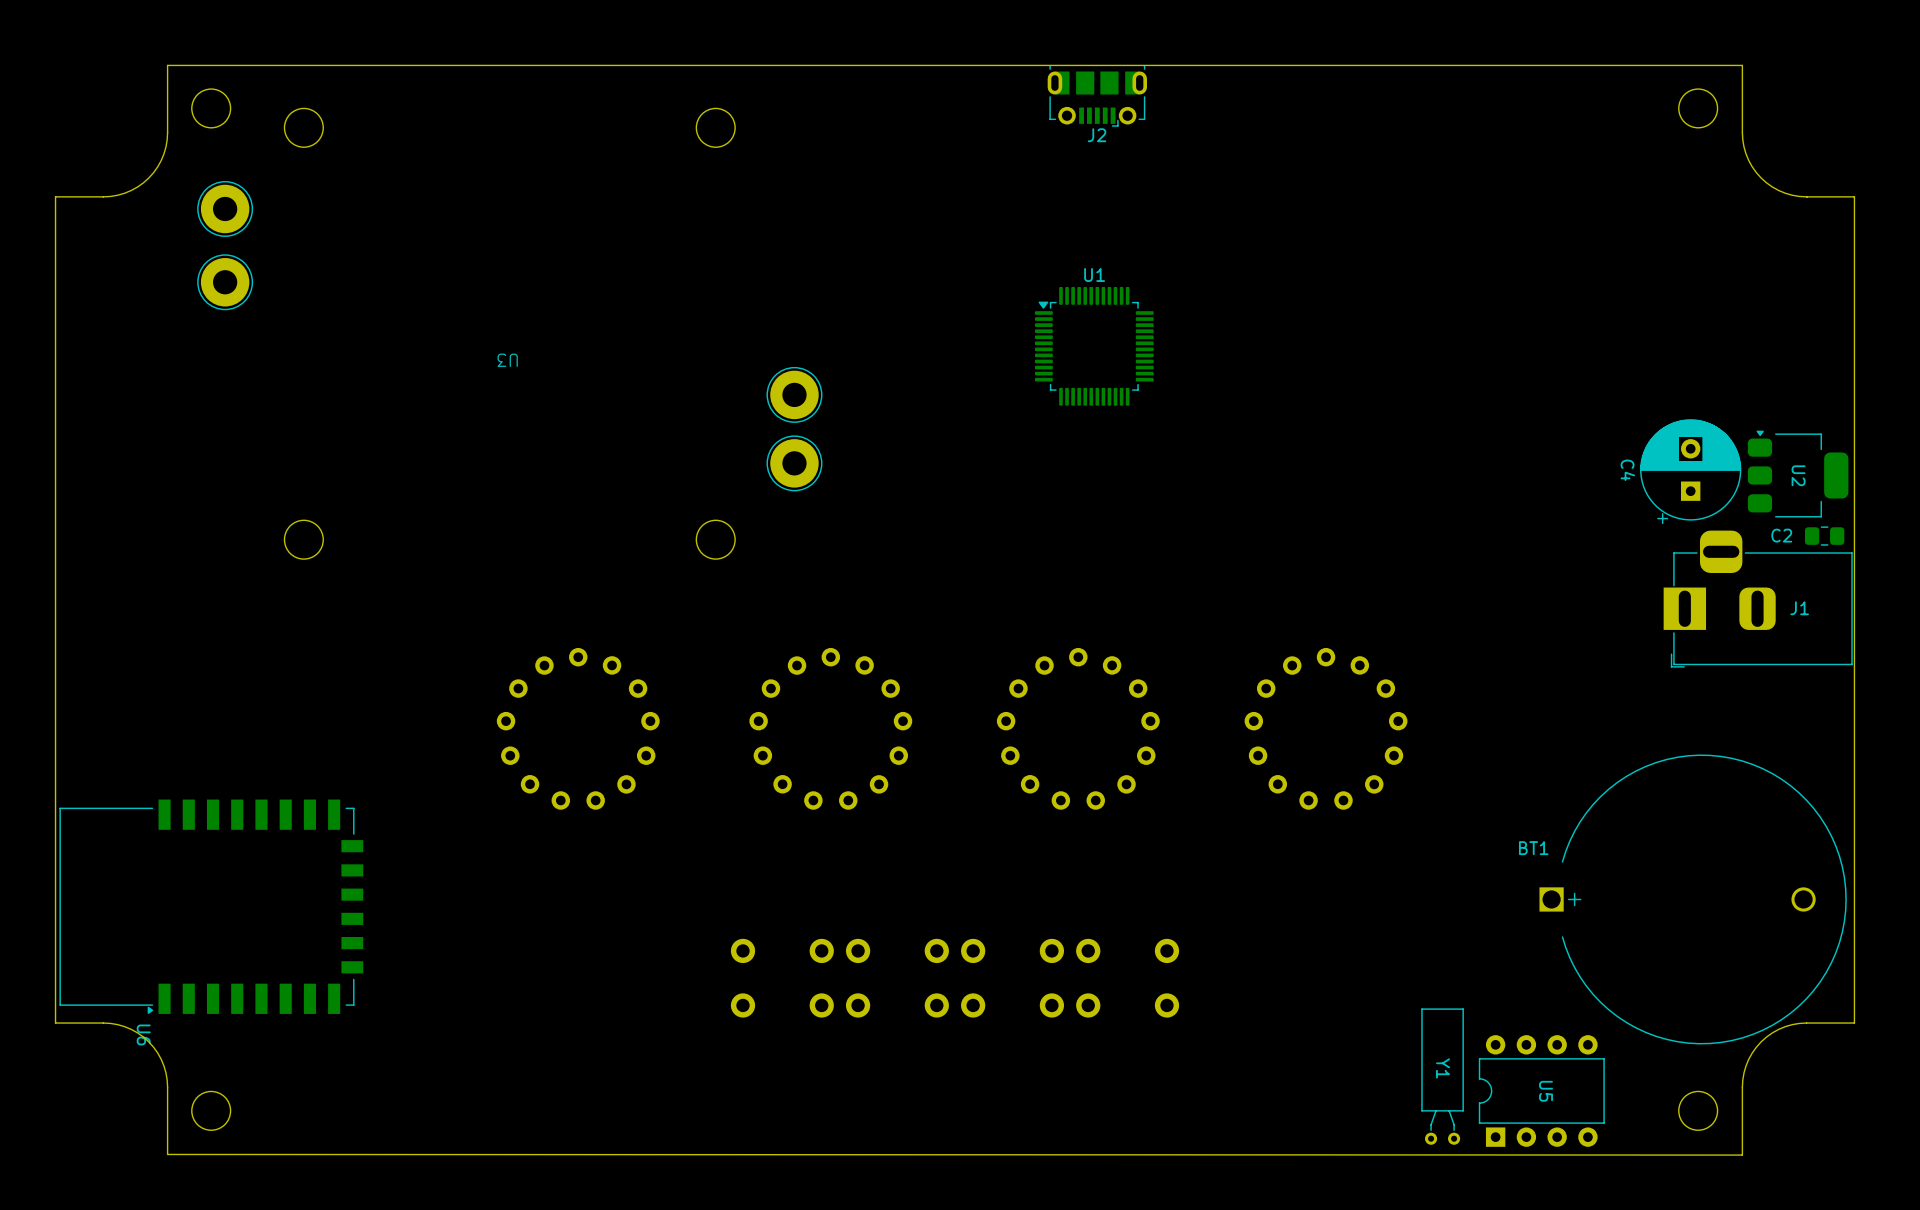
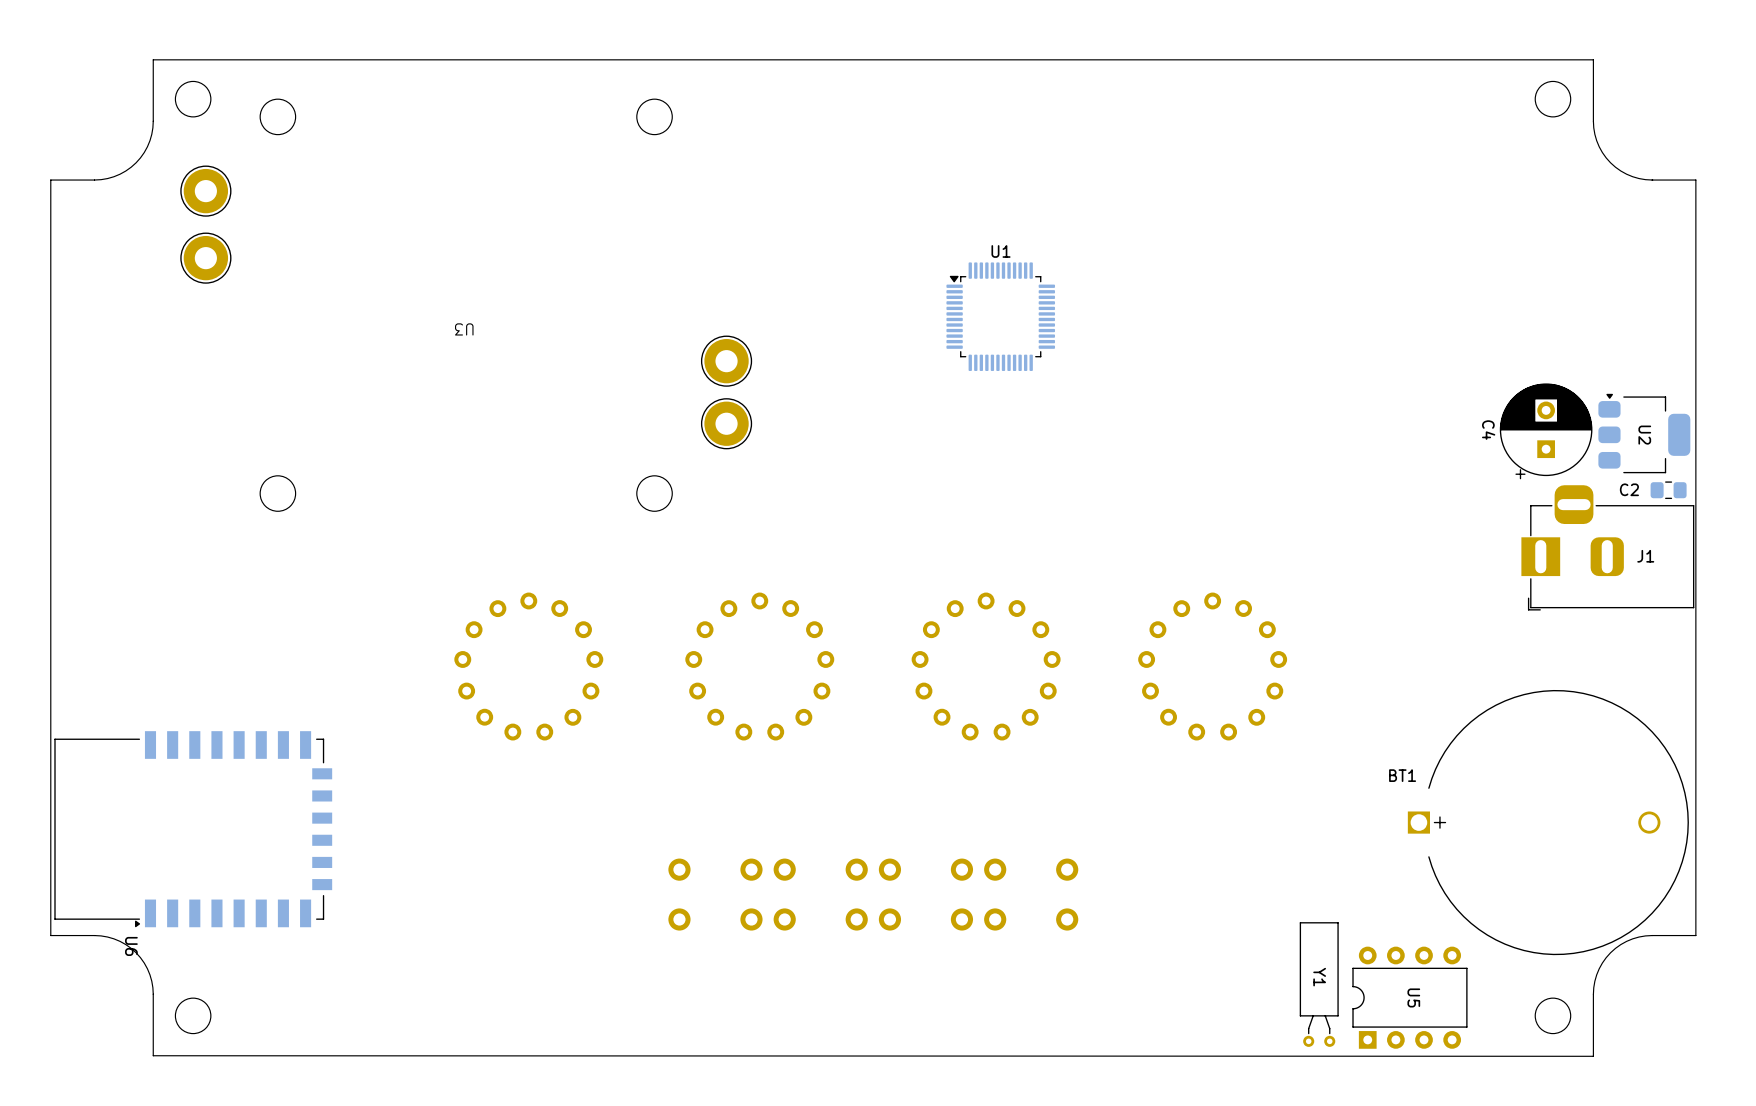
J2: (1097, 96) -> none

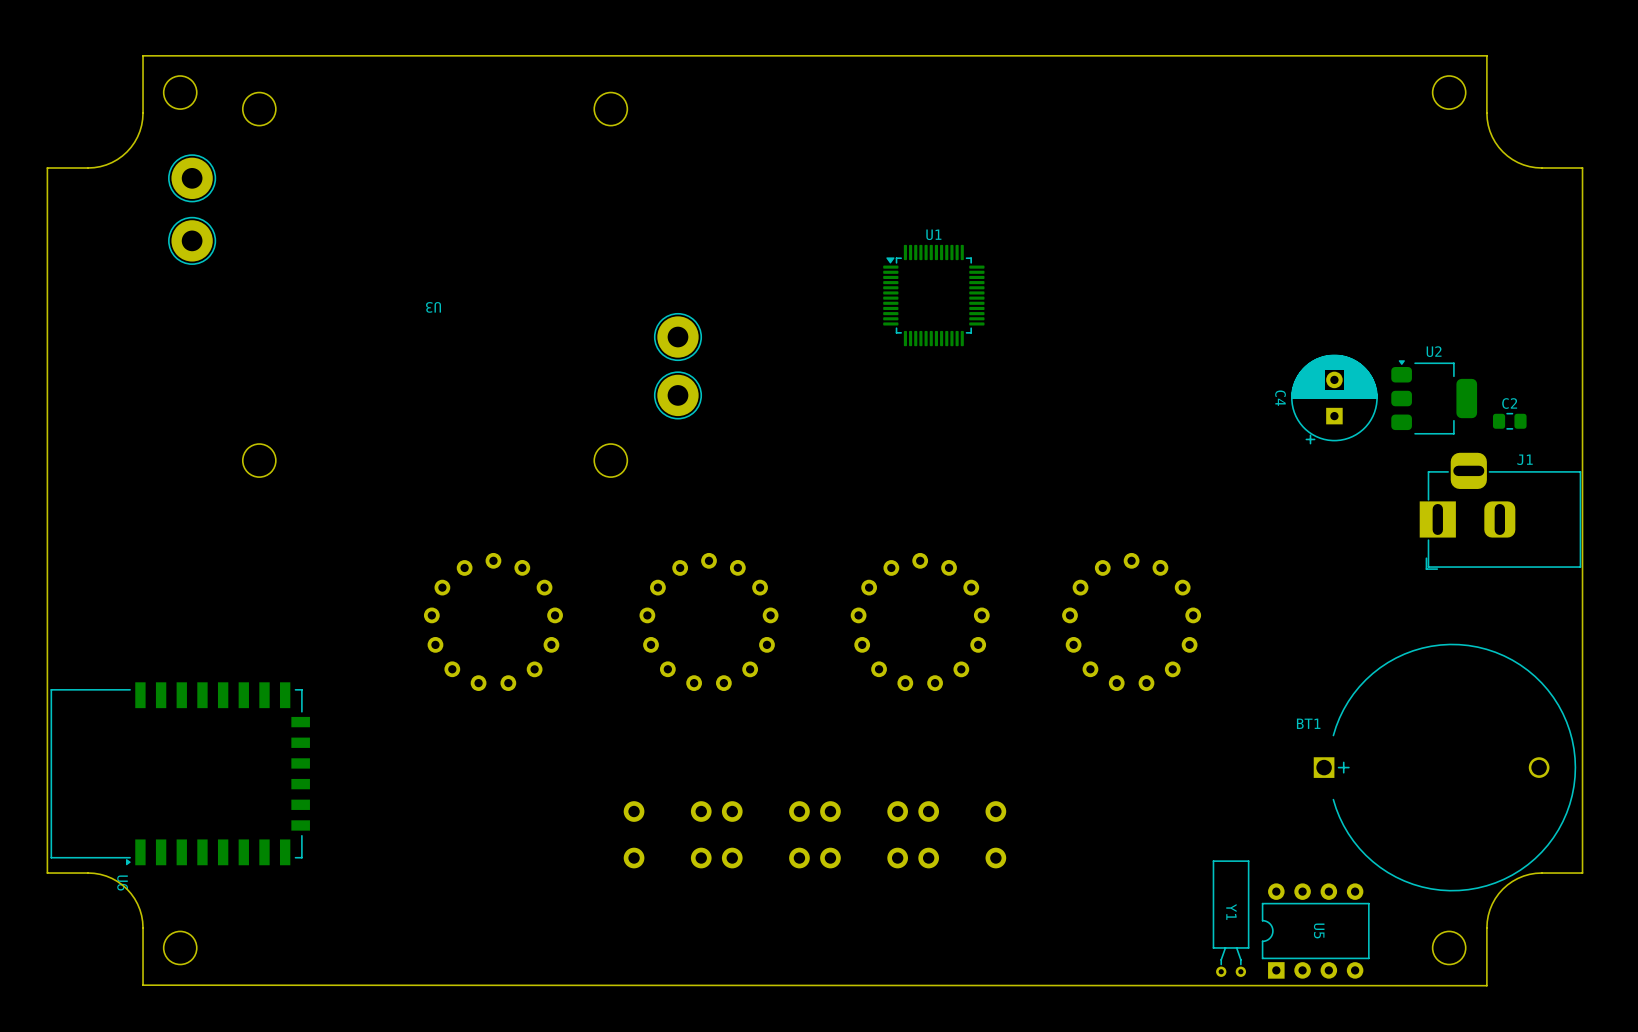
C4 position: (1546, 431) -> (1334, 399)
U2 position: (1644, 433) -> (1434, 397)
U2 name rotation: 0° (1644, 435) -> 90° counterclockwise (1434, 351)
U2 name position: U2 (1644, 435) -> U2 (1434, 351)
C2 name position: C2 (1629, 489) -> C2 (1509, 403)
C2 position: (1668, 490) -> (1509, 421)
J1 name position: J1 (1645, 556) -> J1 (1525, 459)

